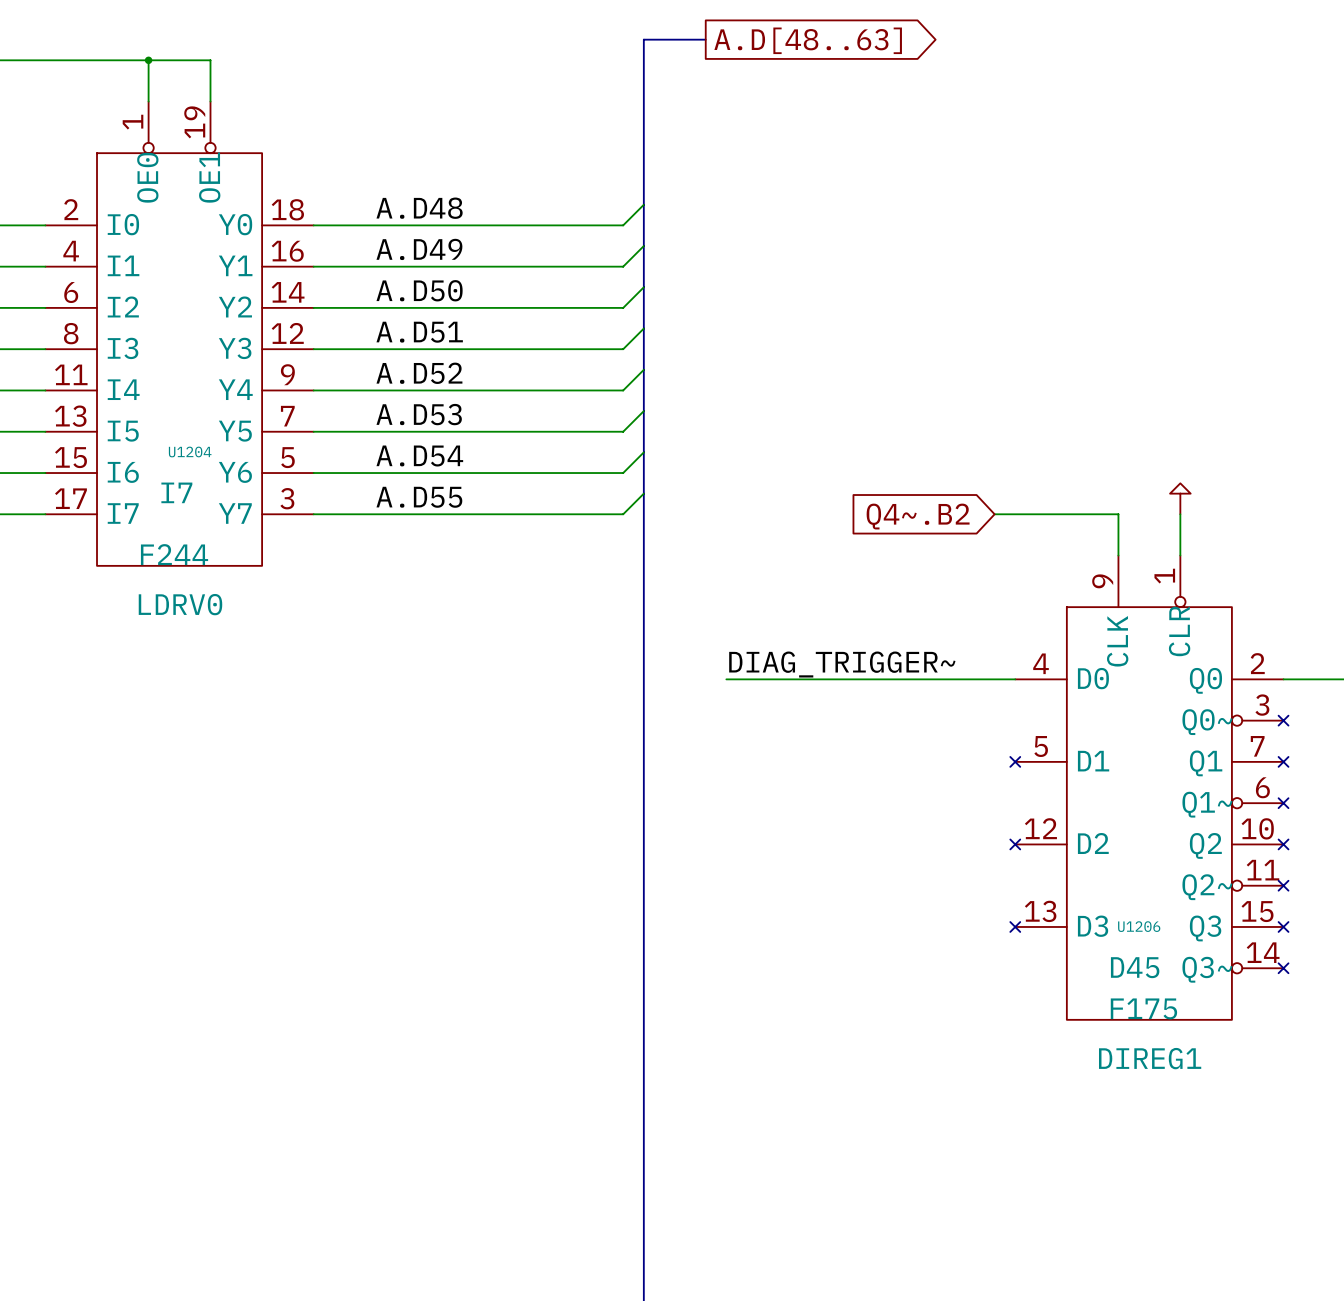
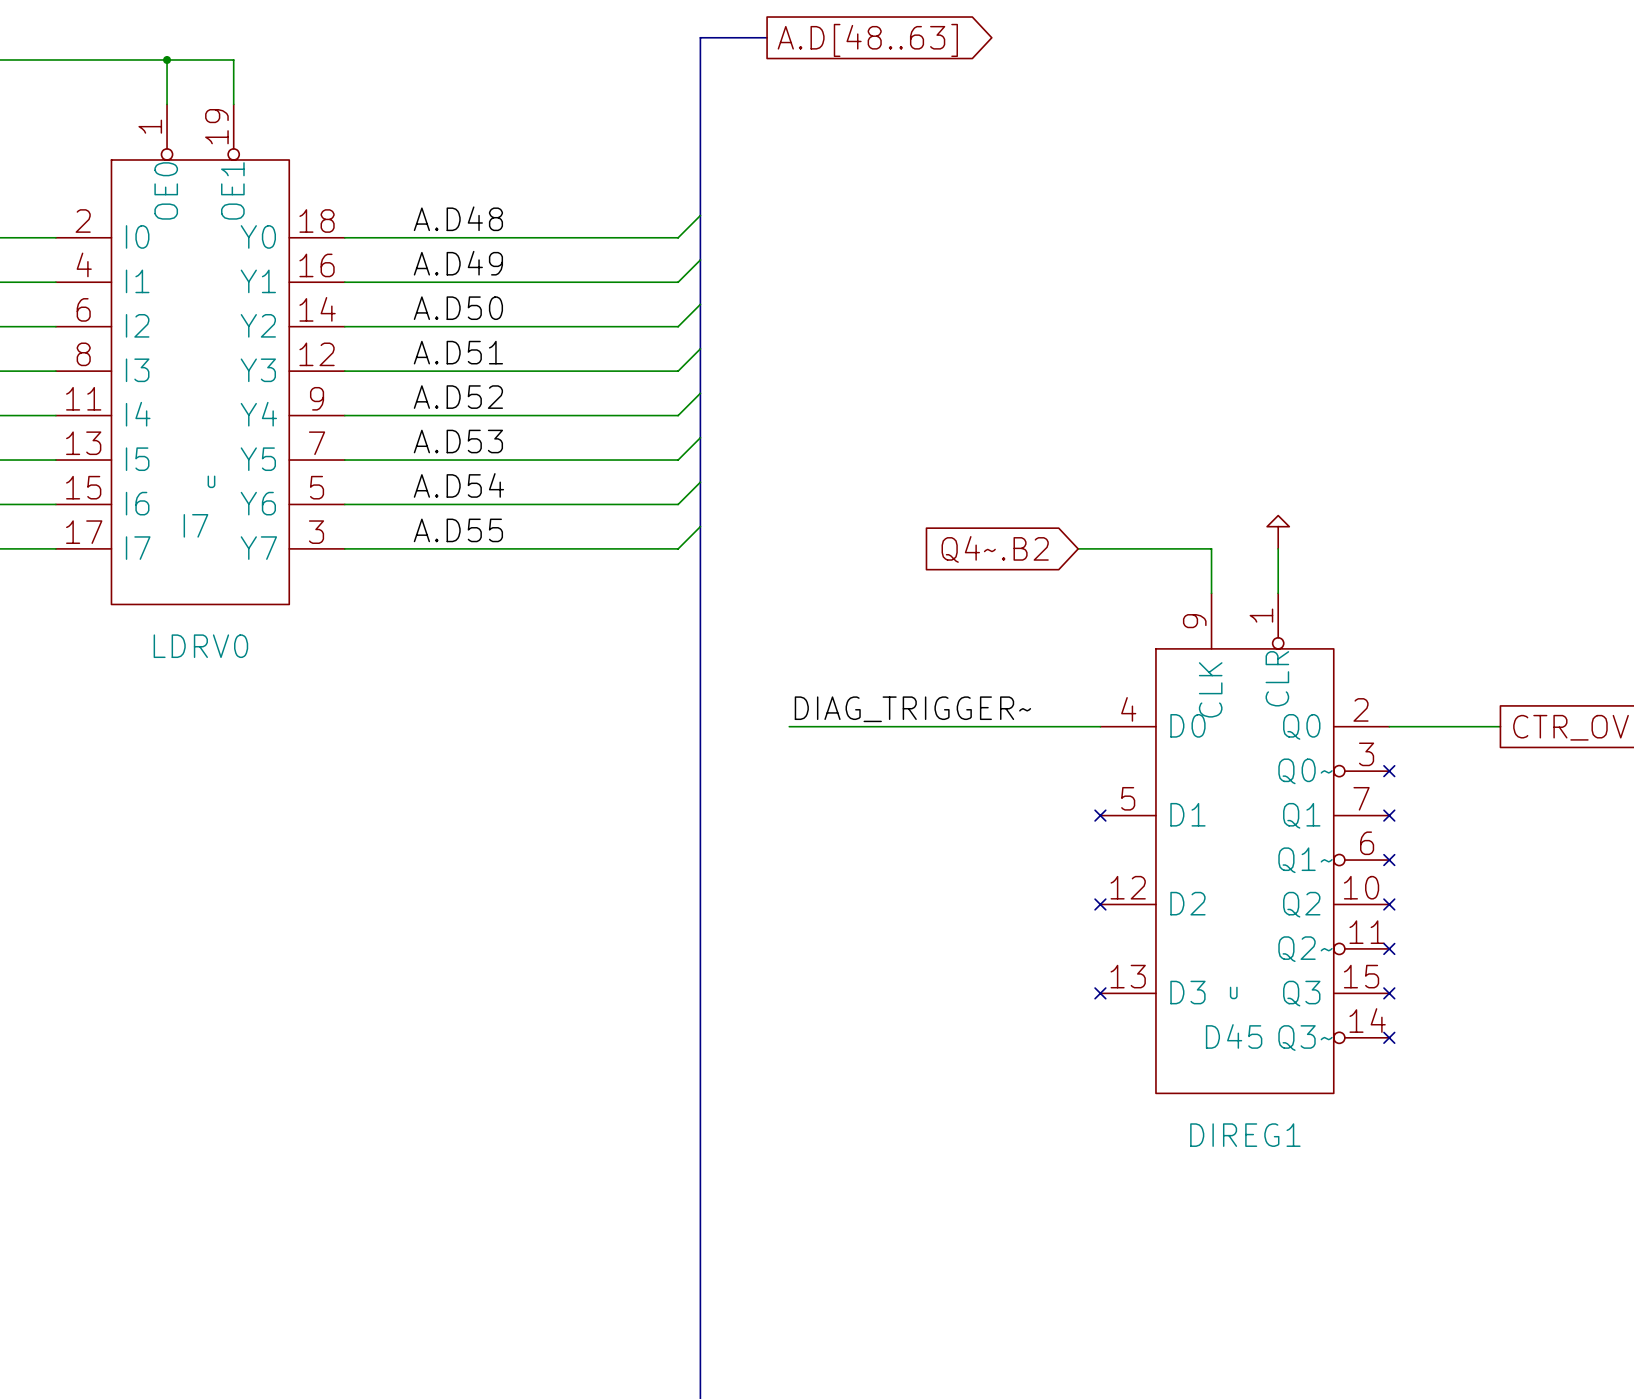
U1204 name: U1204 (190, 451) -> U (211, 481)
U1204 value: F244 (174, 554) -> none
U1206 name: U1206 (1139, 926) -> U (1233, 992)
U1206 value: F175 (1143, 1008) -> none

